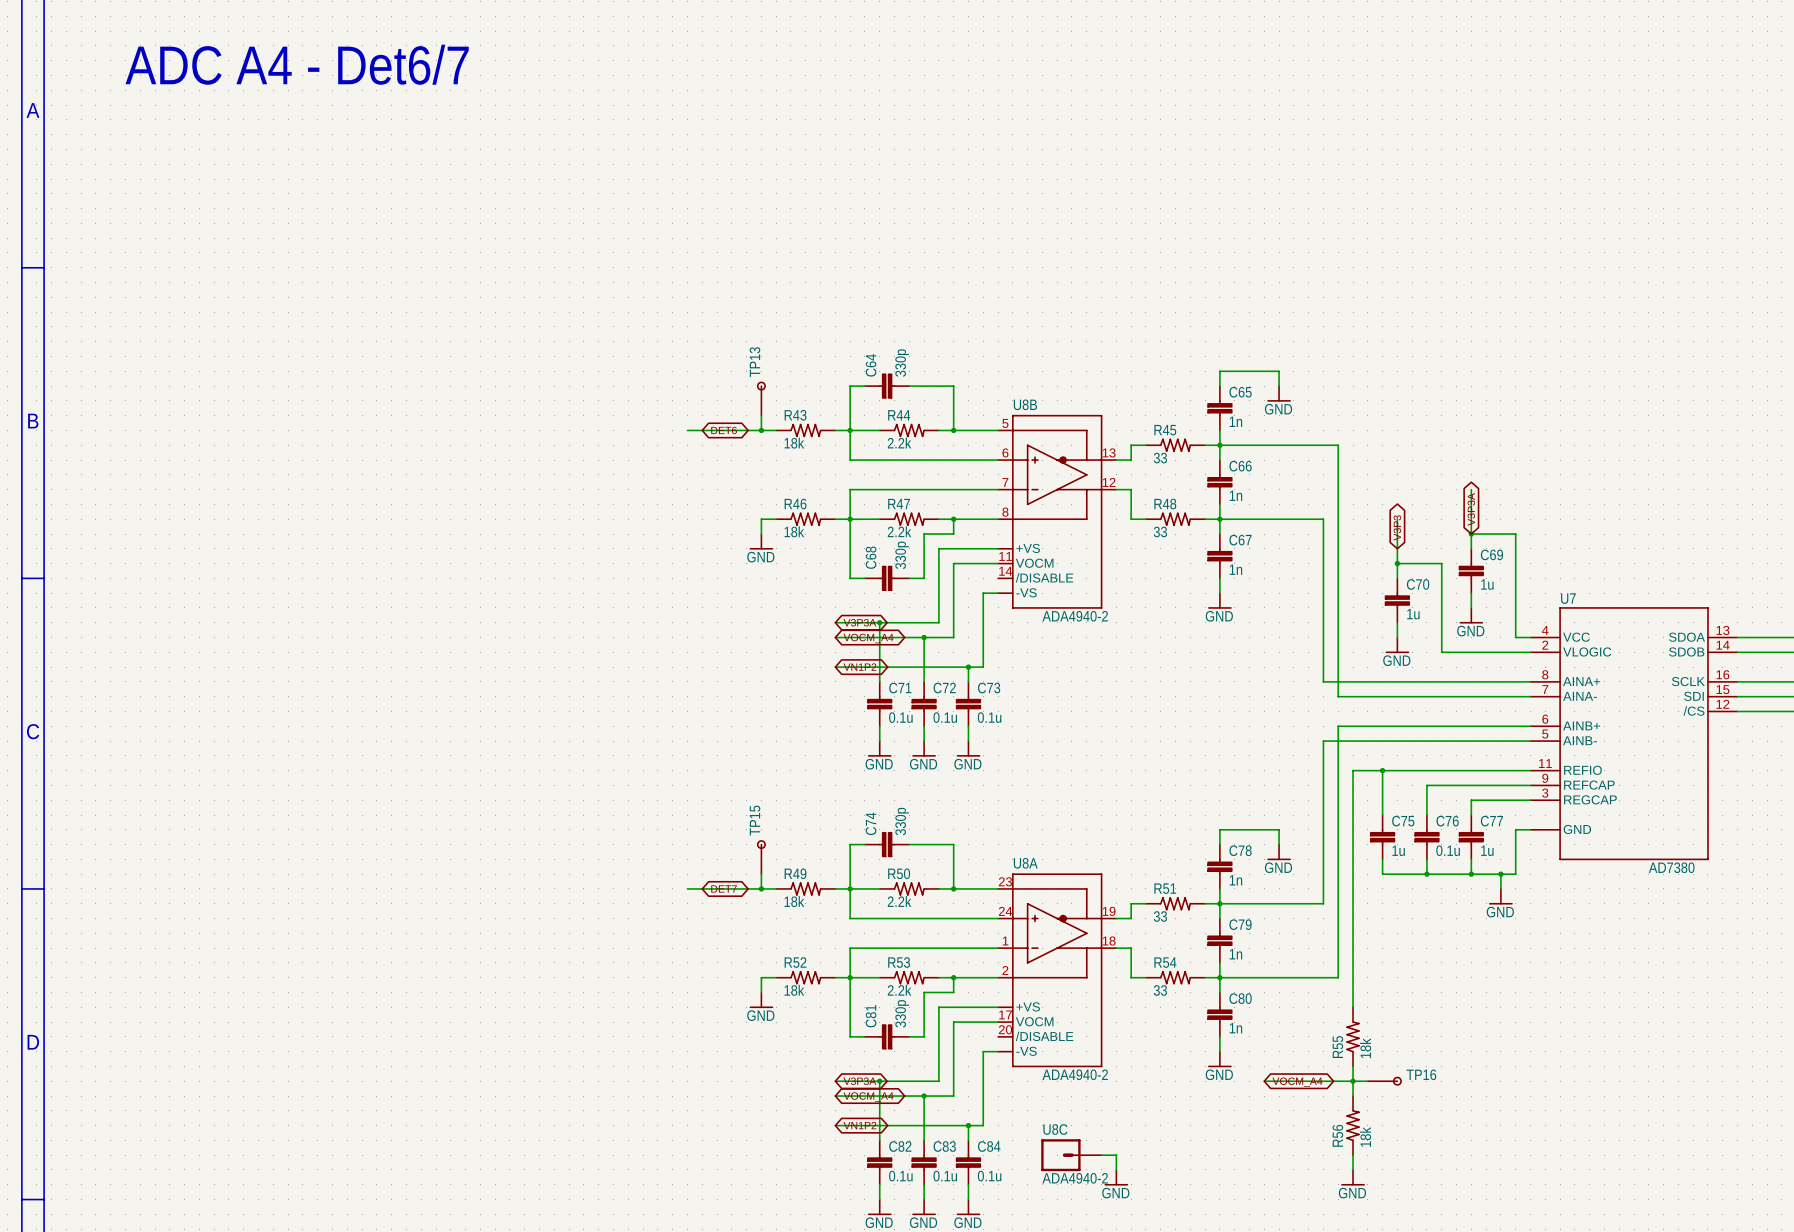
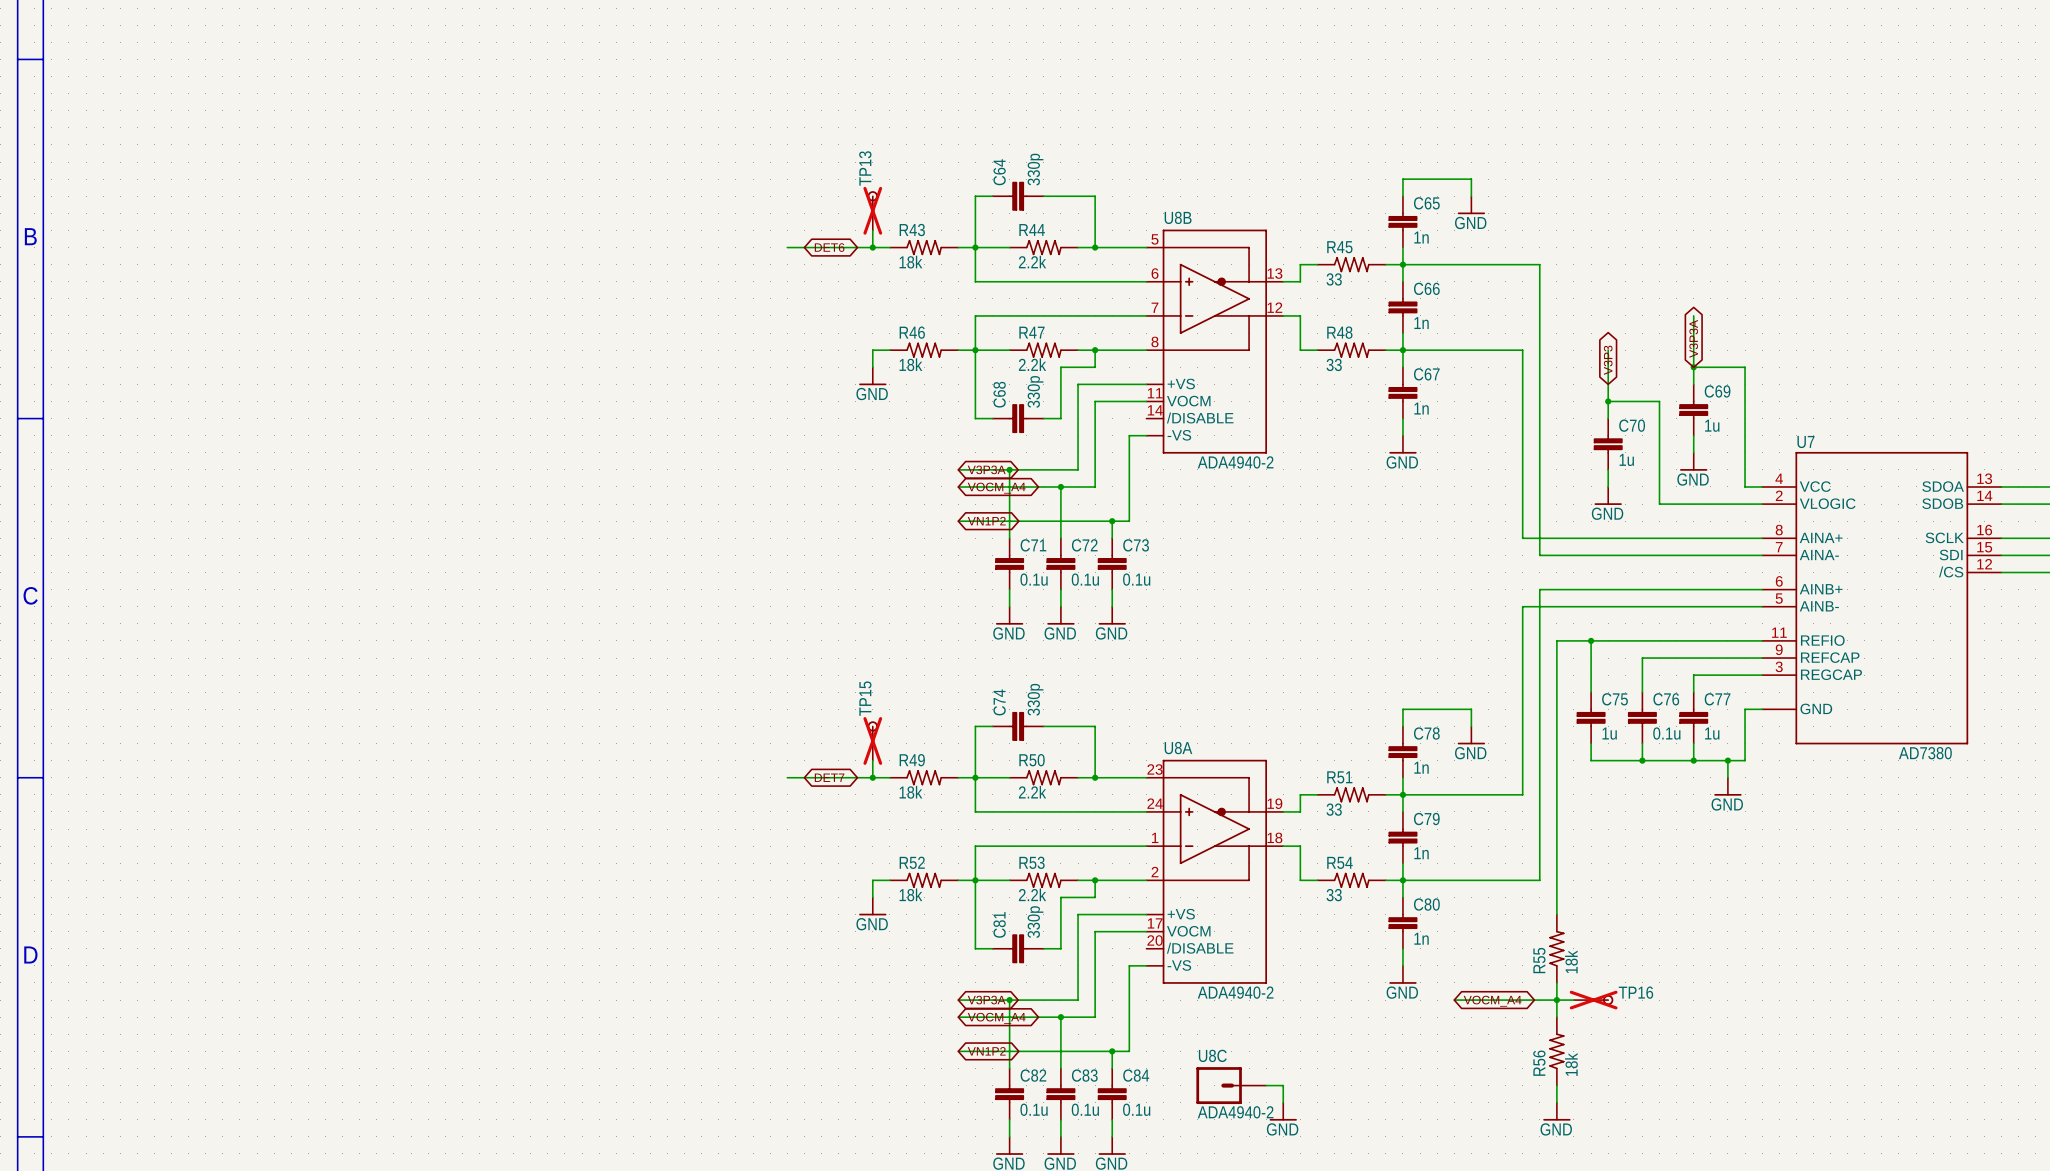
TP13 do-not-place cross: none -> (872, 210)
TP15 do-not-place cross: none -> (872, 740)
TP16 do-not-place cross: none -> (1593, 1000)

